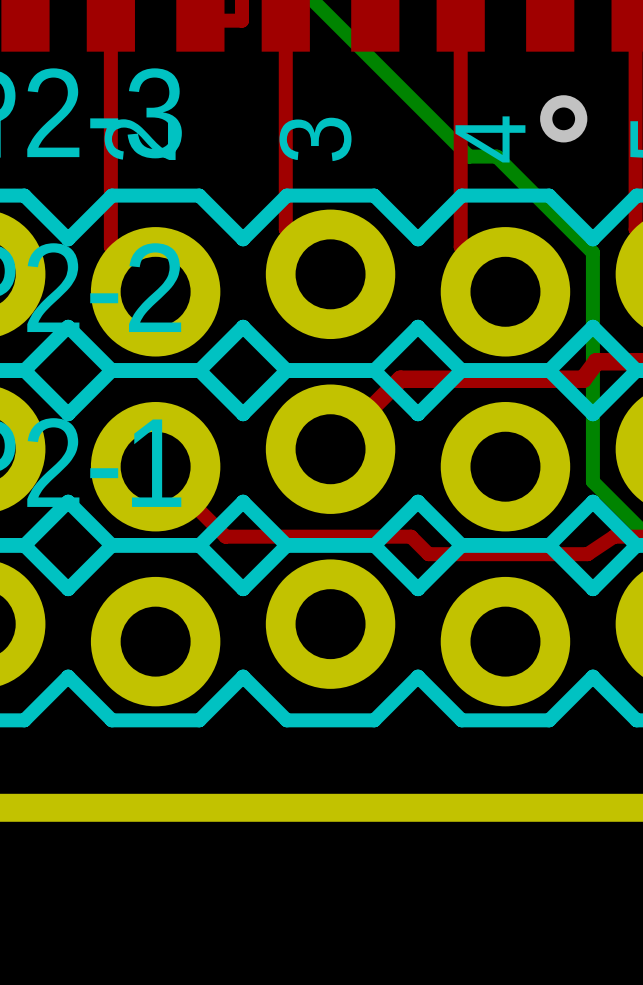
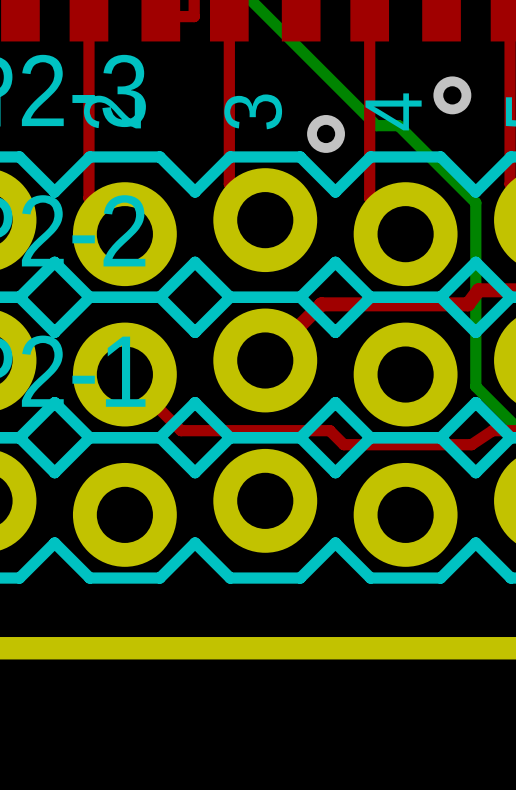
via: none -> (326, 133)

